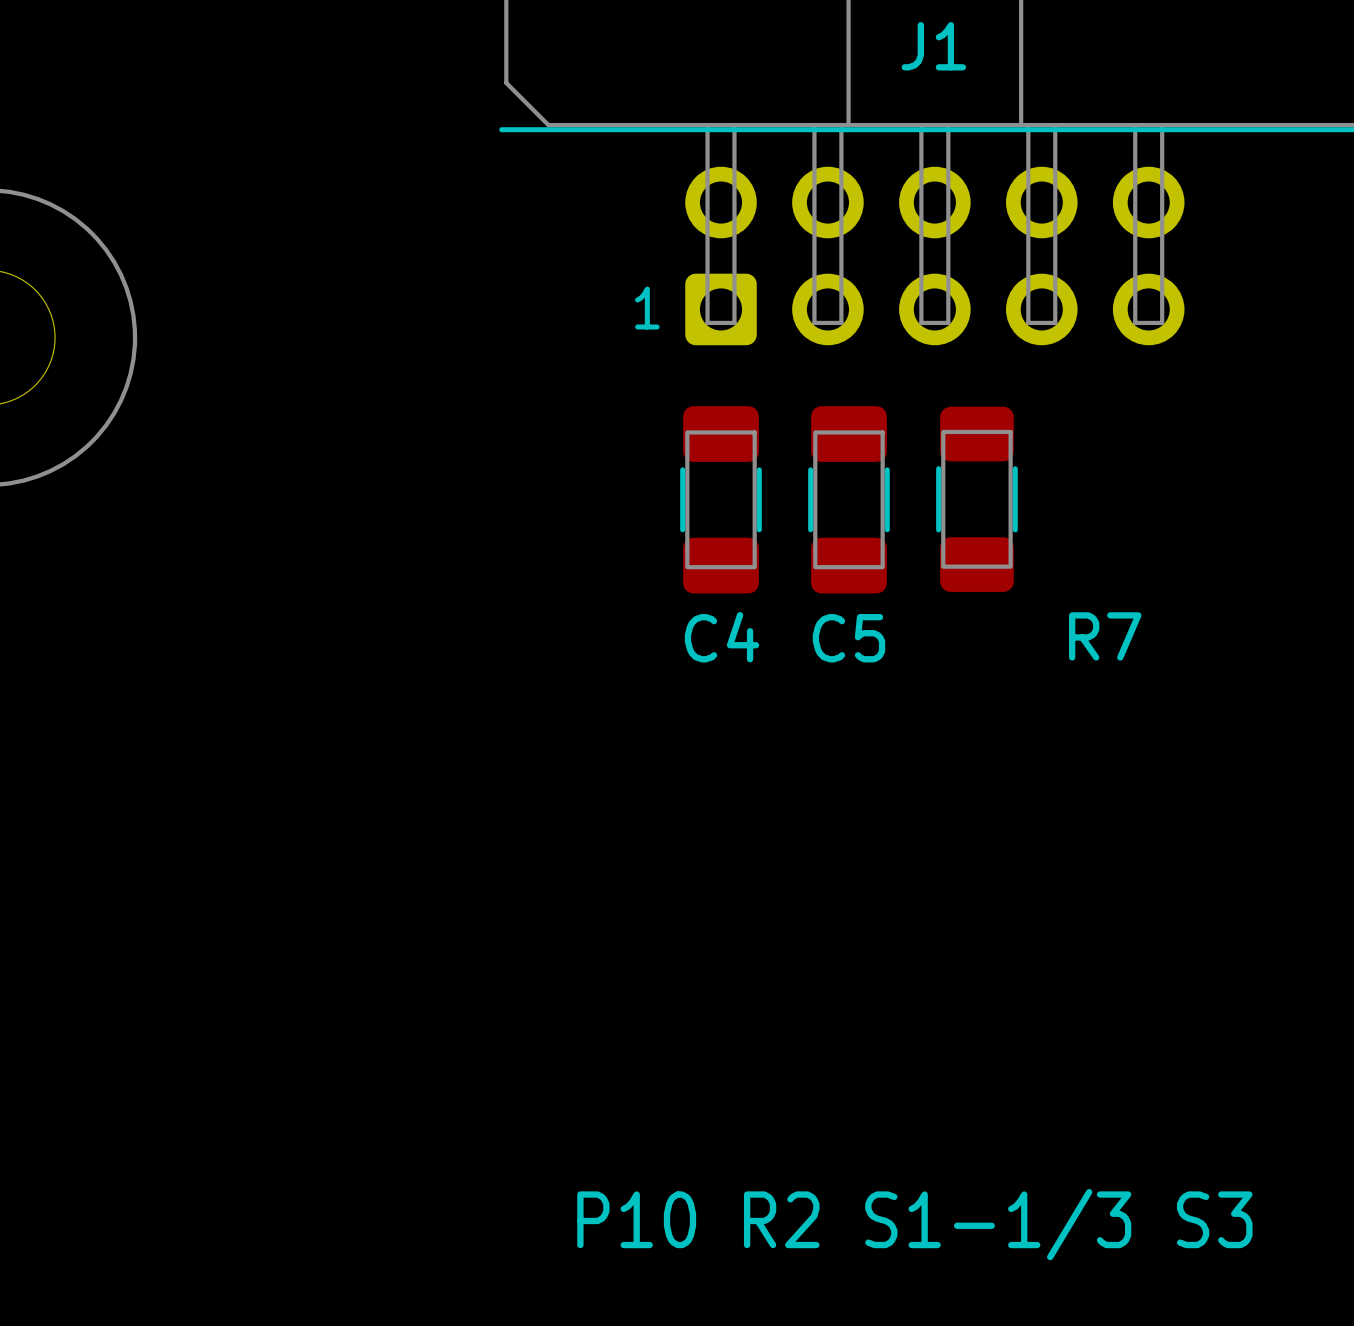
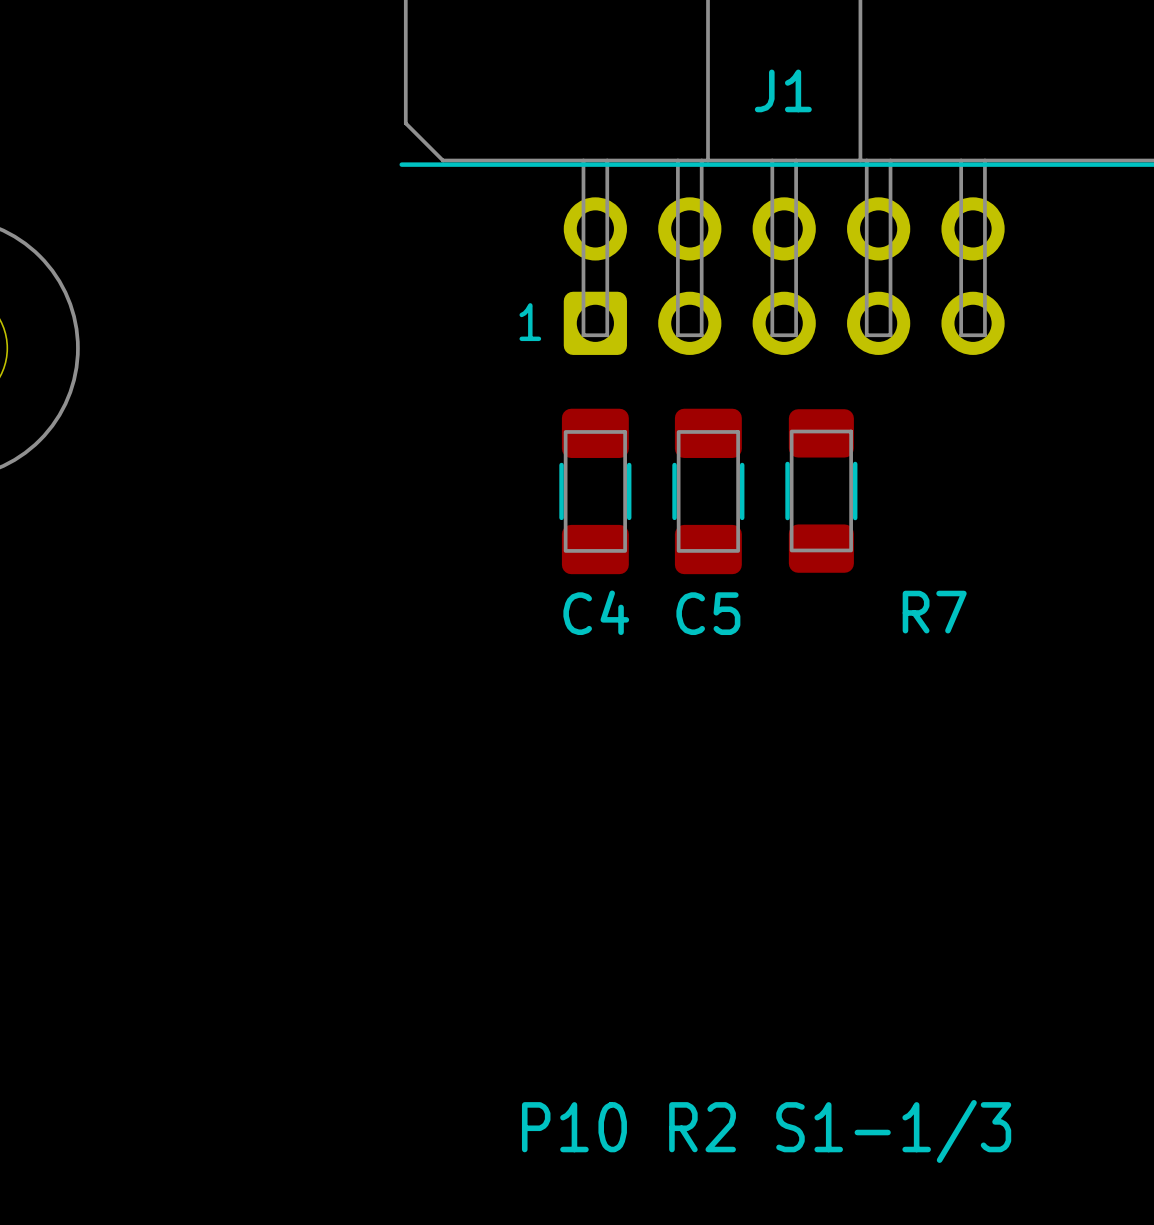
text: P10 R2 S1-1/3 S3 (914, 1224) -> P10 R2 S1-1/3 (766, 1131)

